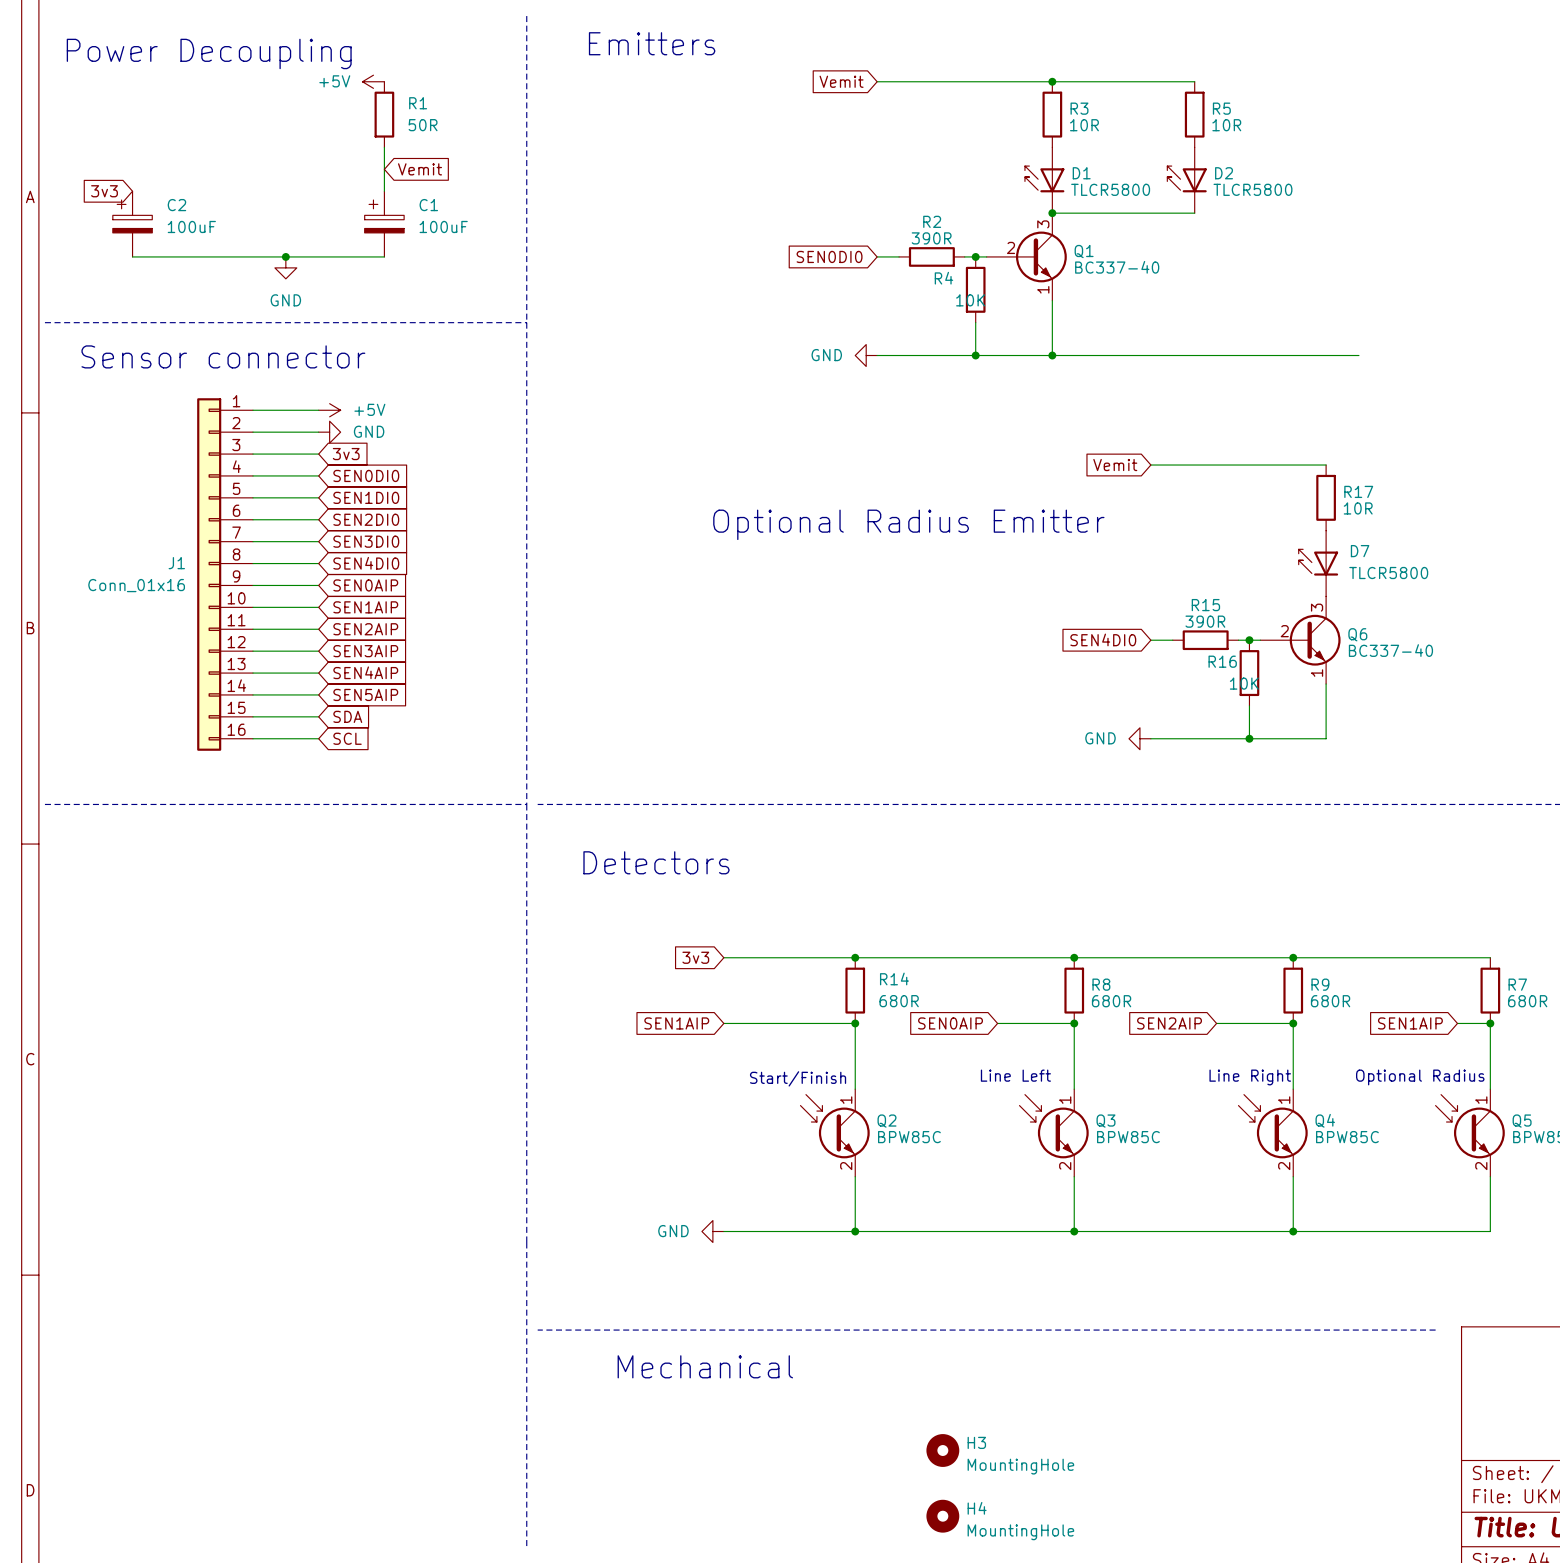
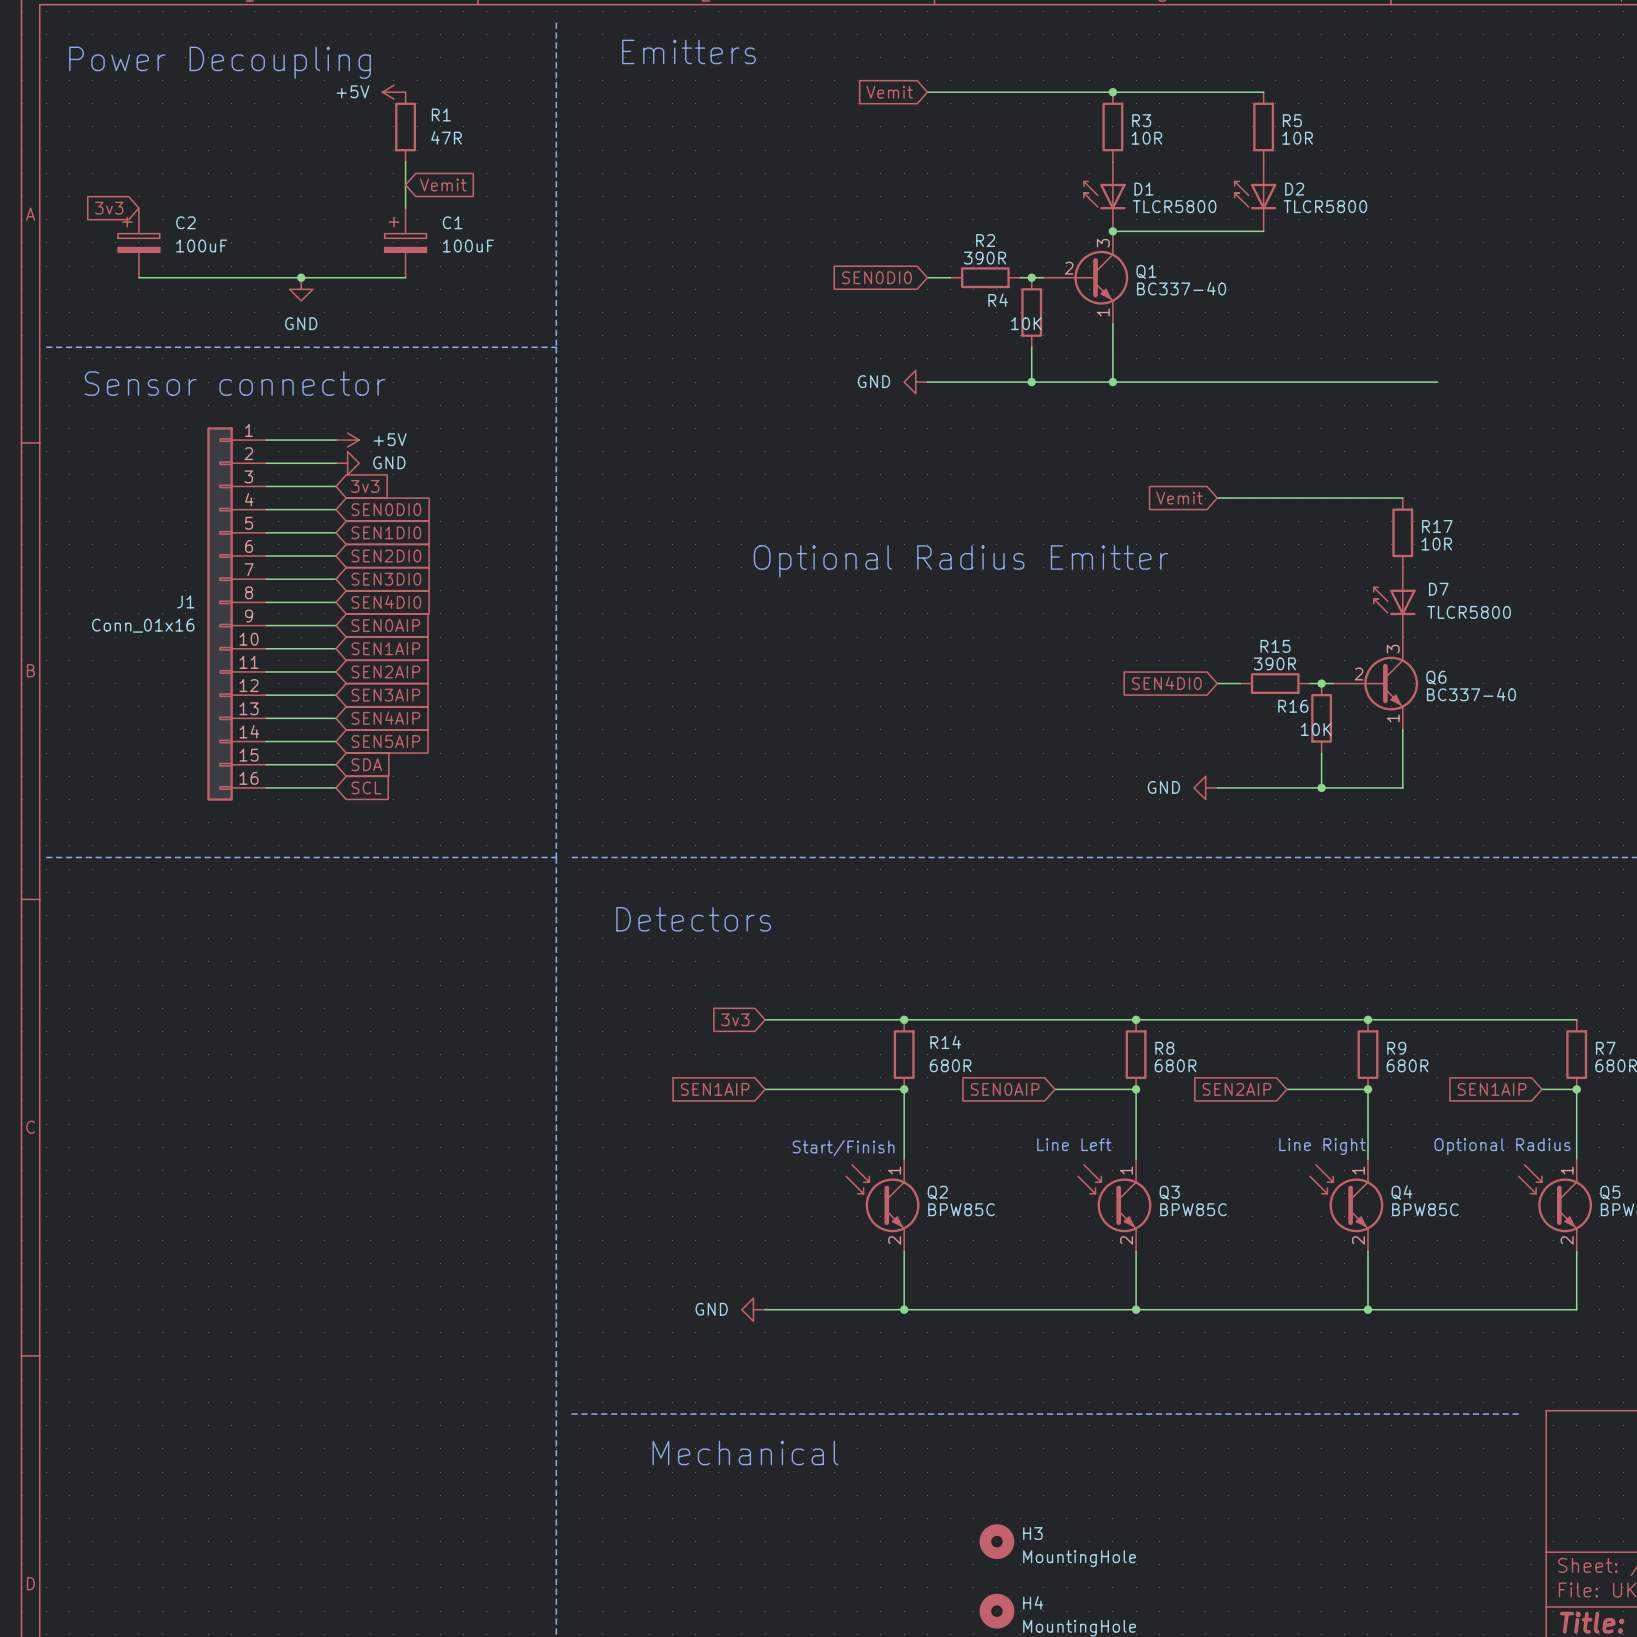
R1 value: 50R (423, 125) -> 47R (446, 137)

